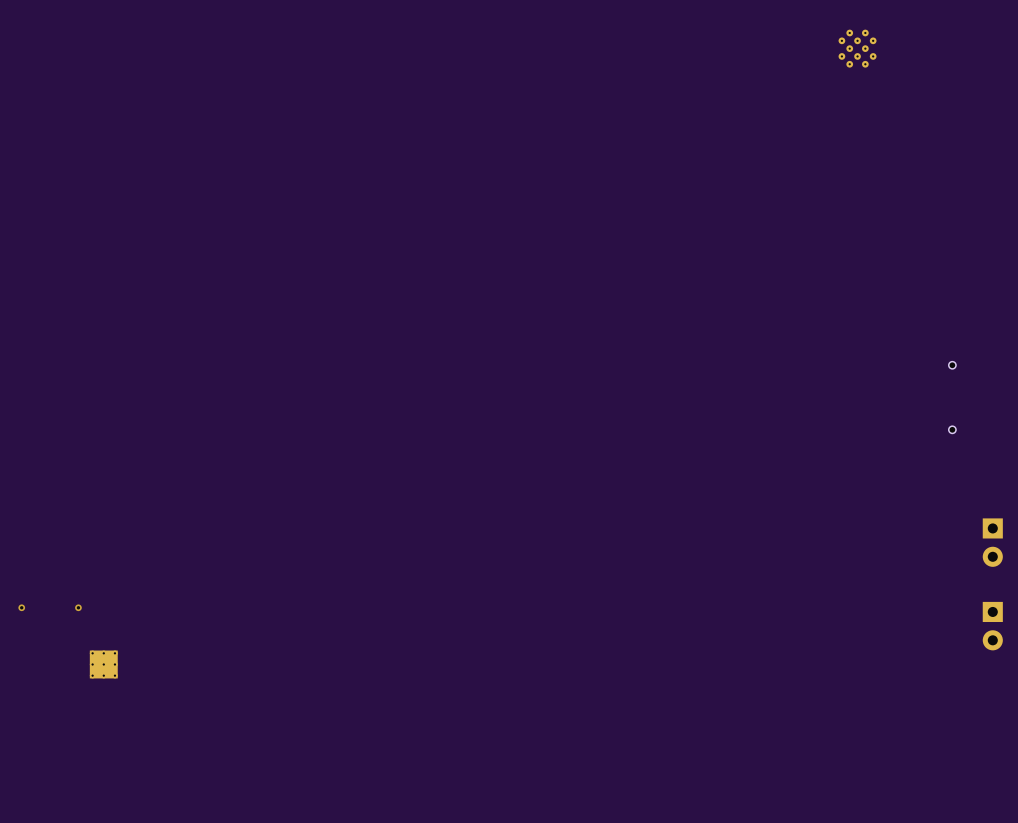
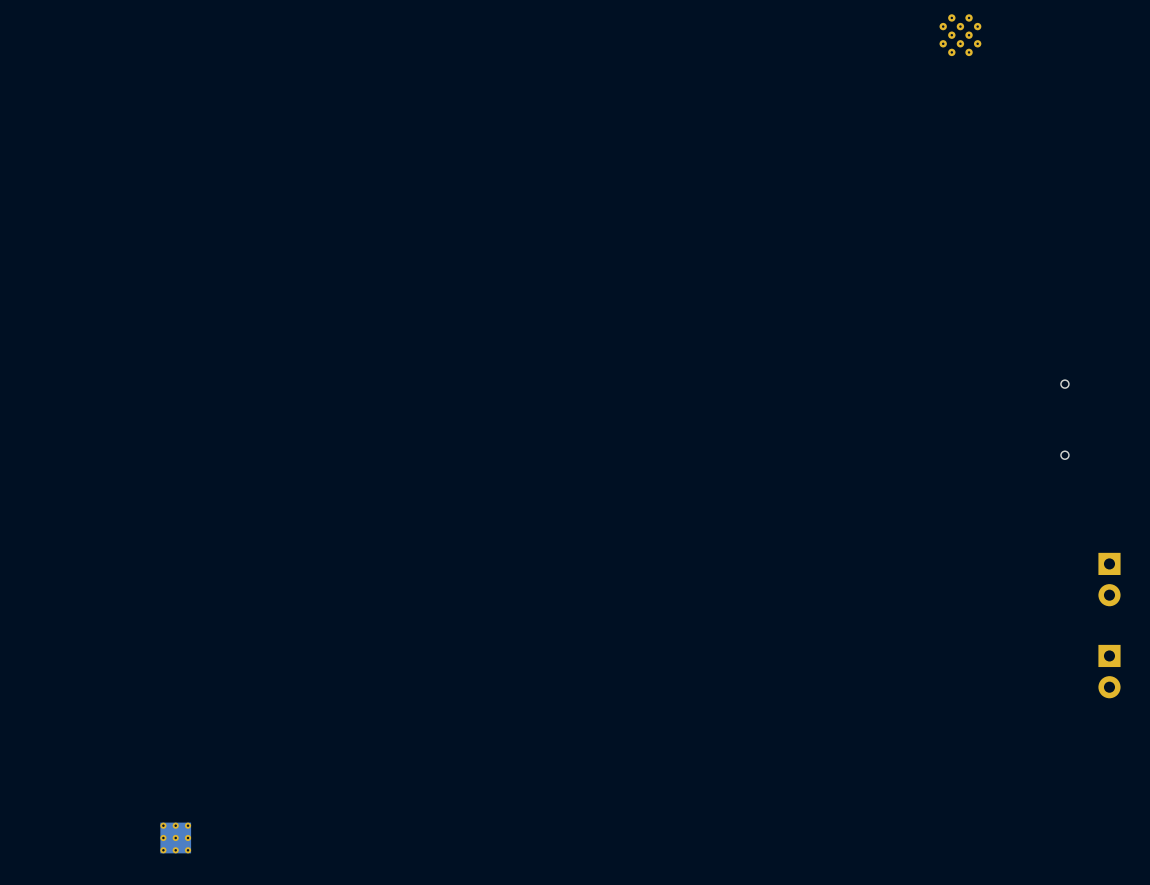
via: (21, 607) -> none
via: (78, 607) -> none
part position: (103, 664) -> (175, 837)

